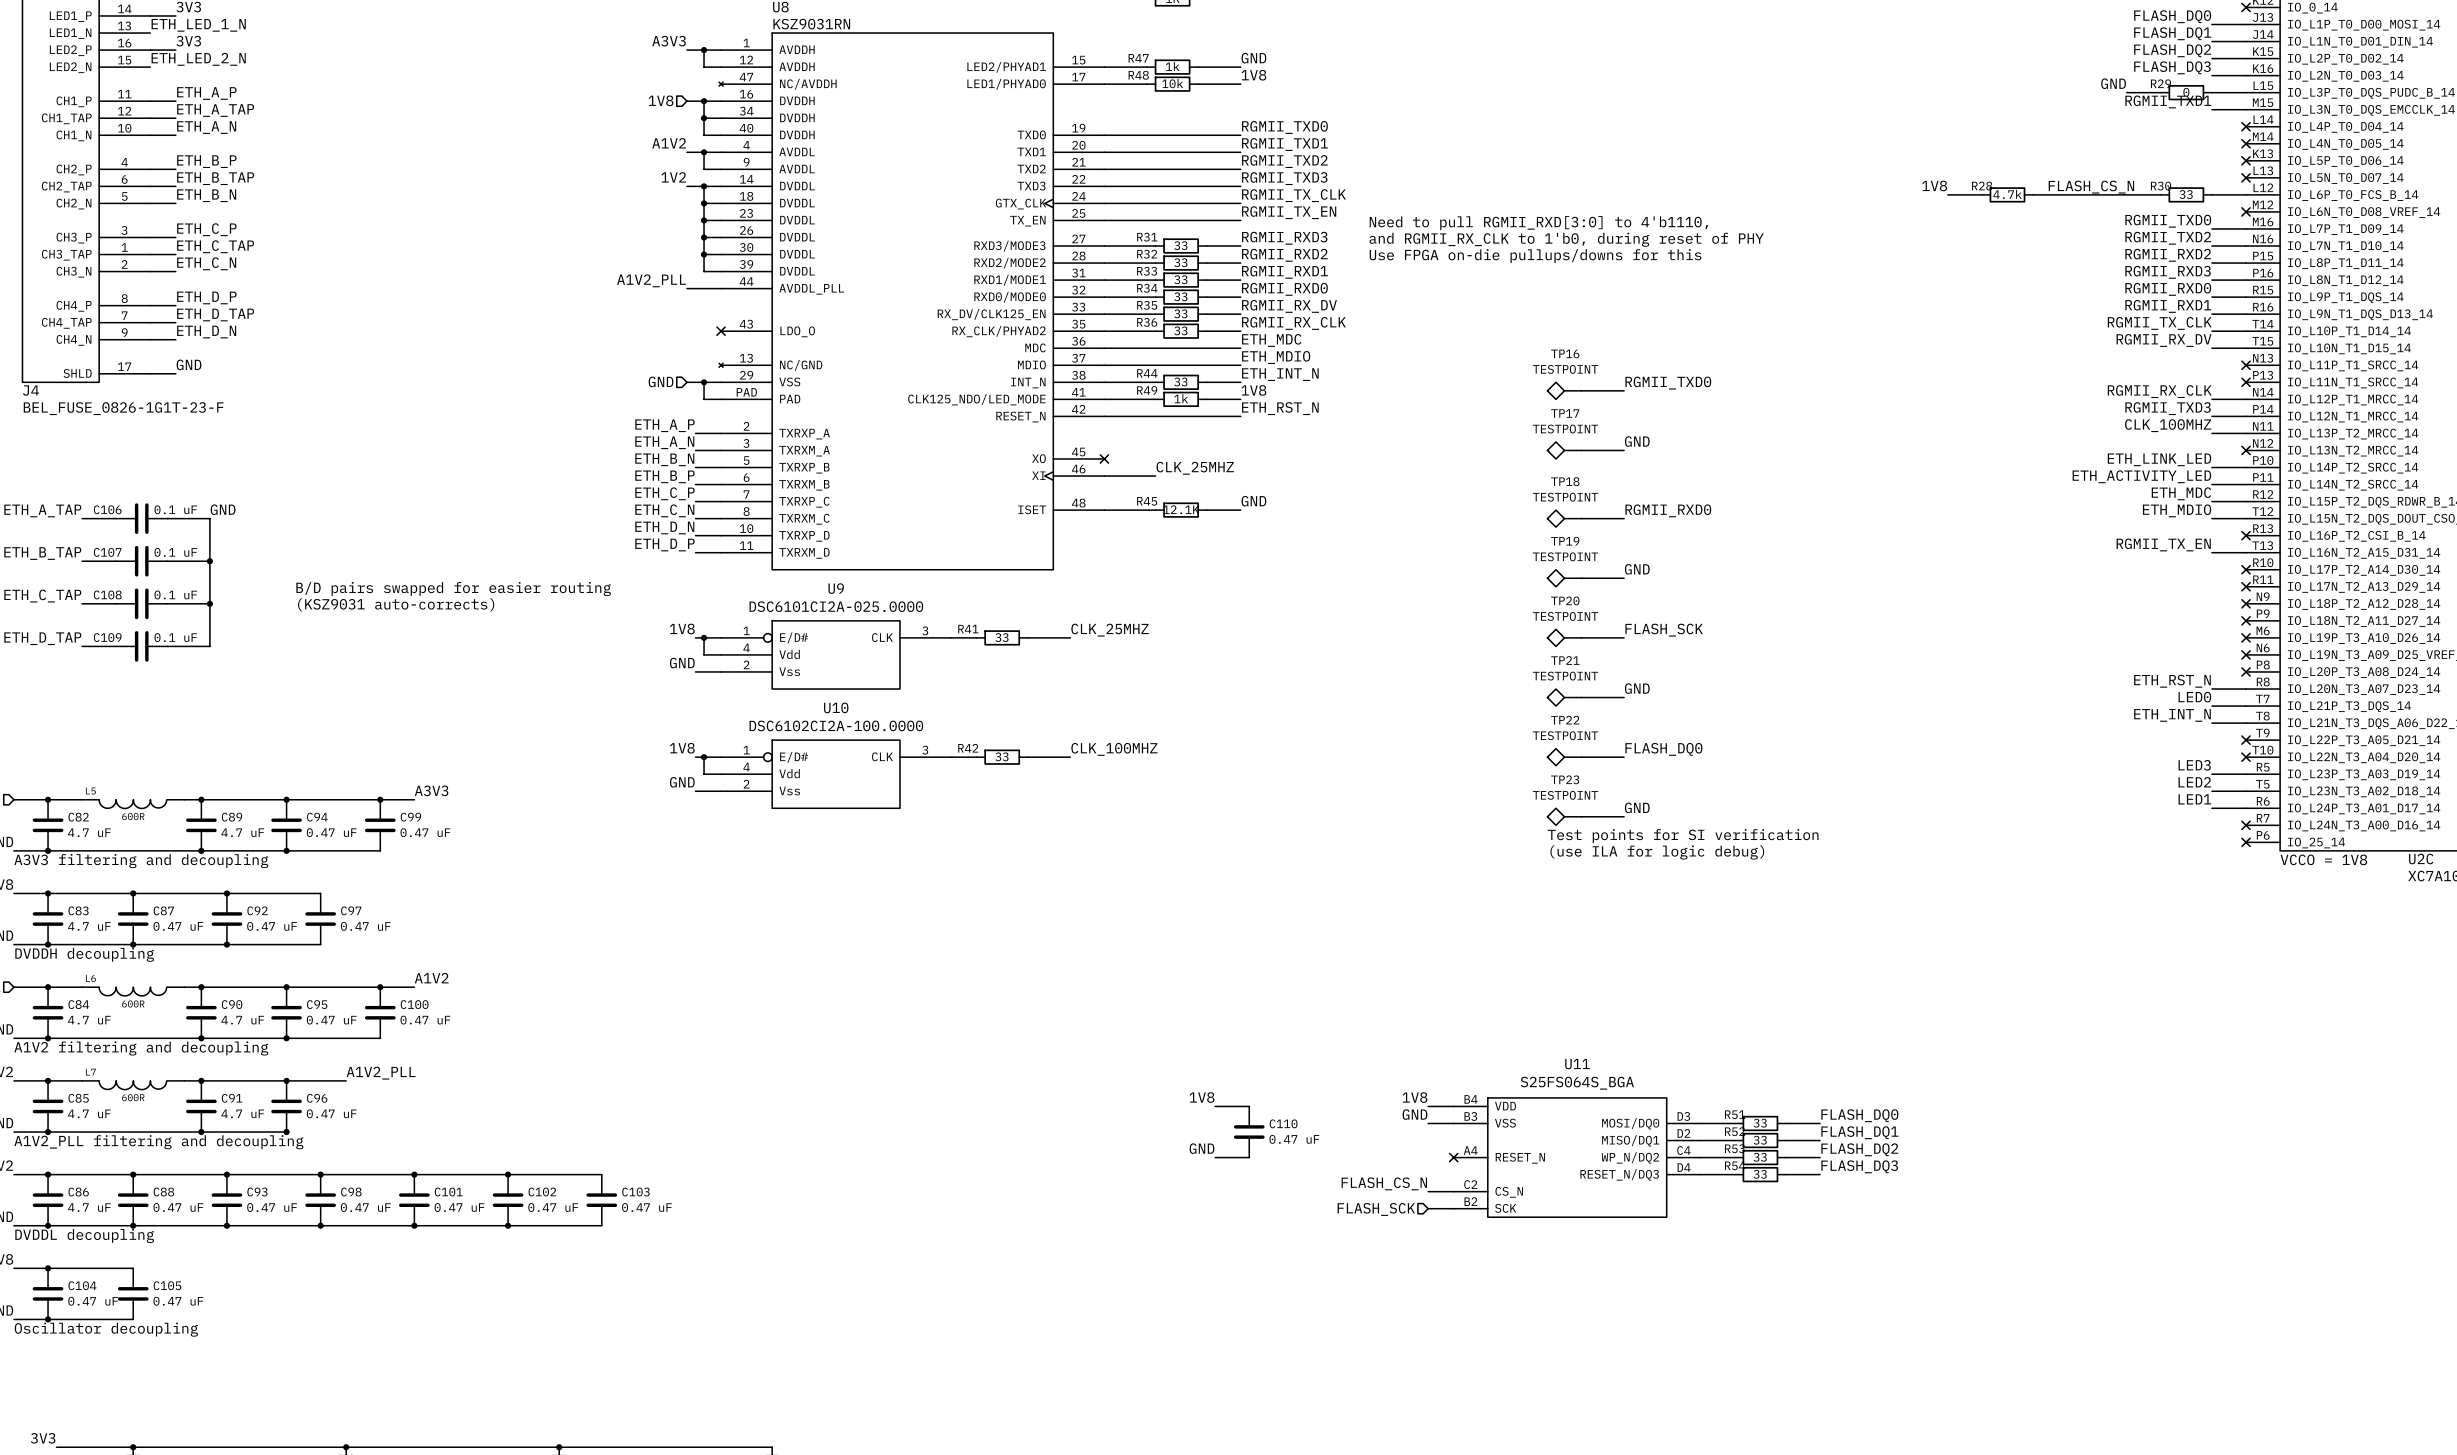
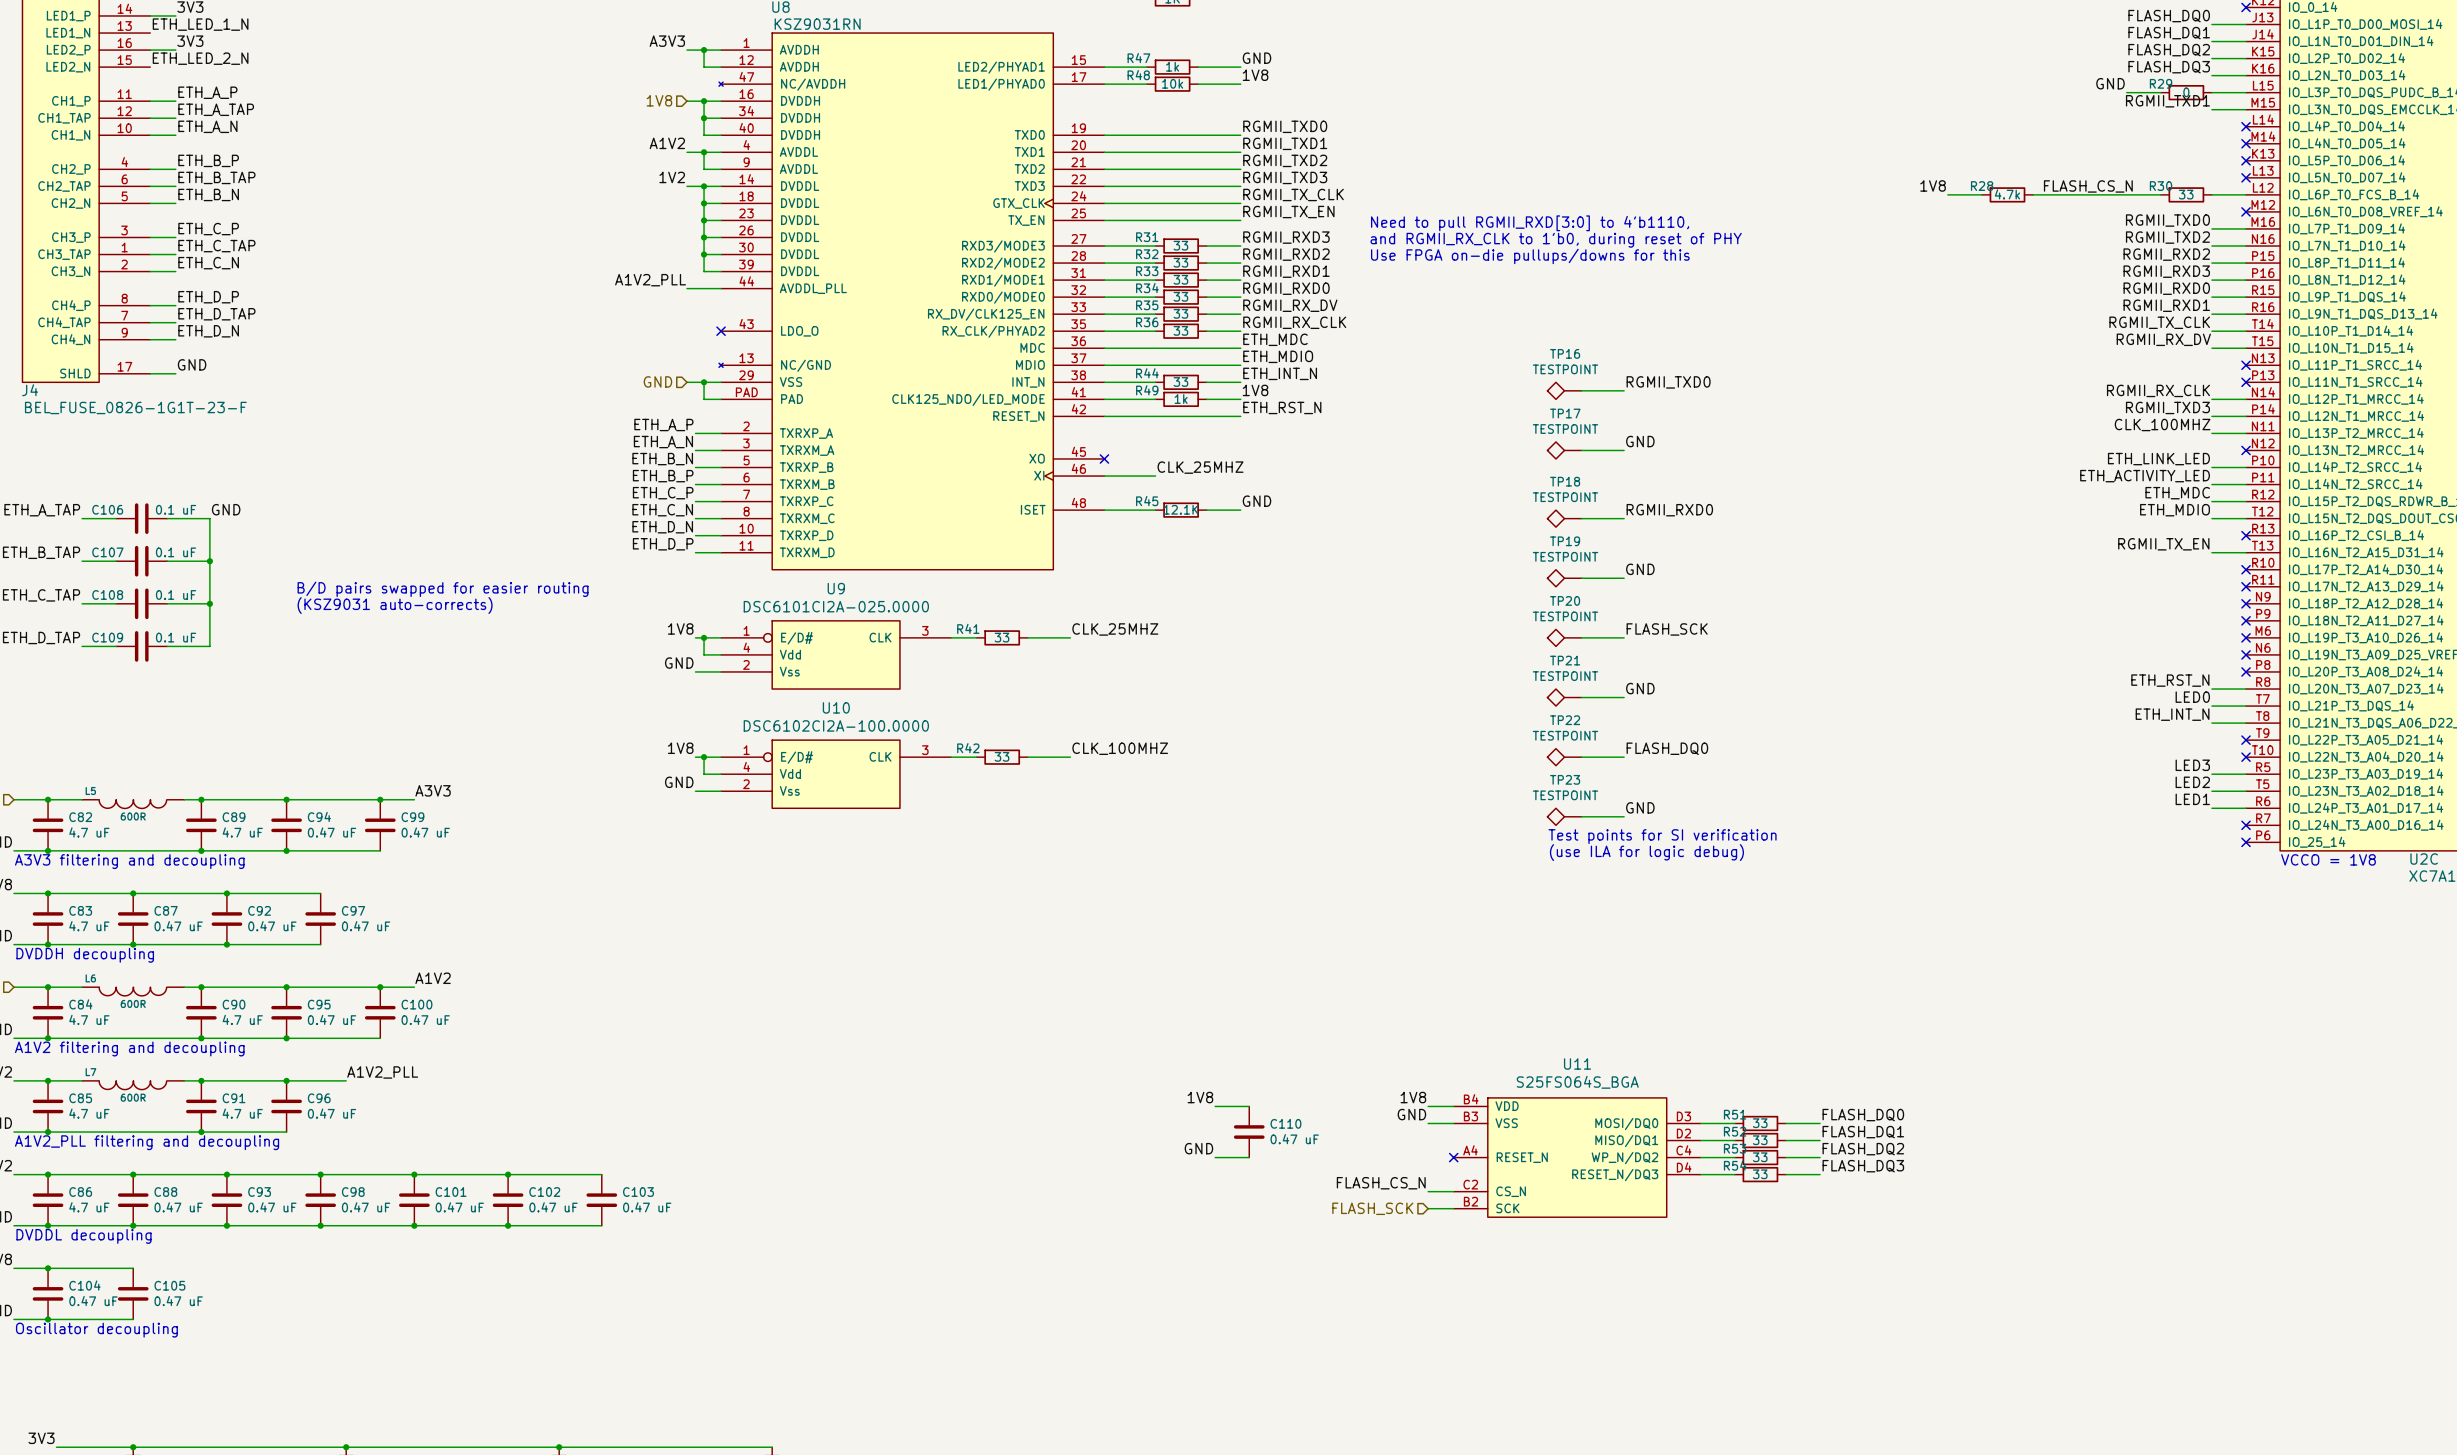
junction: (286, 1132) -> none

